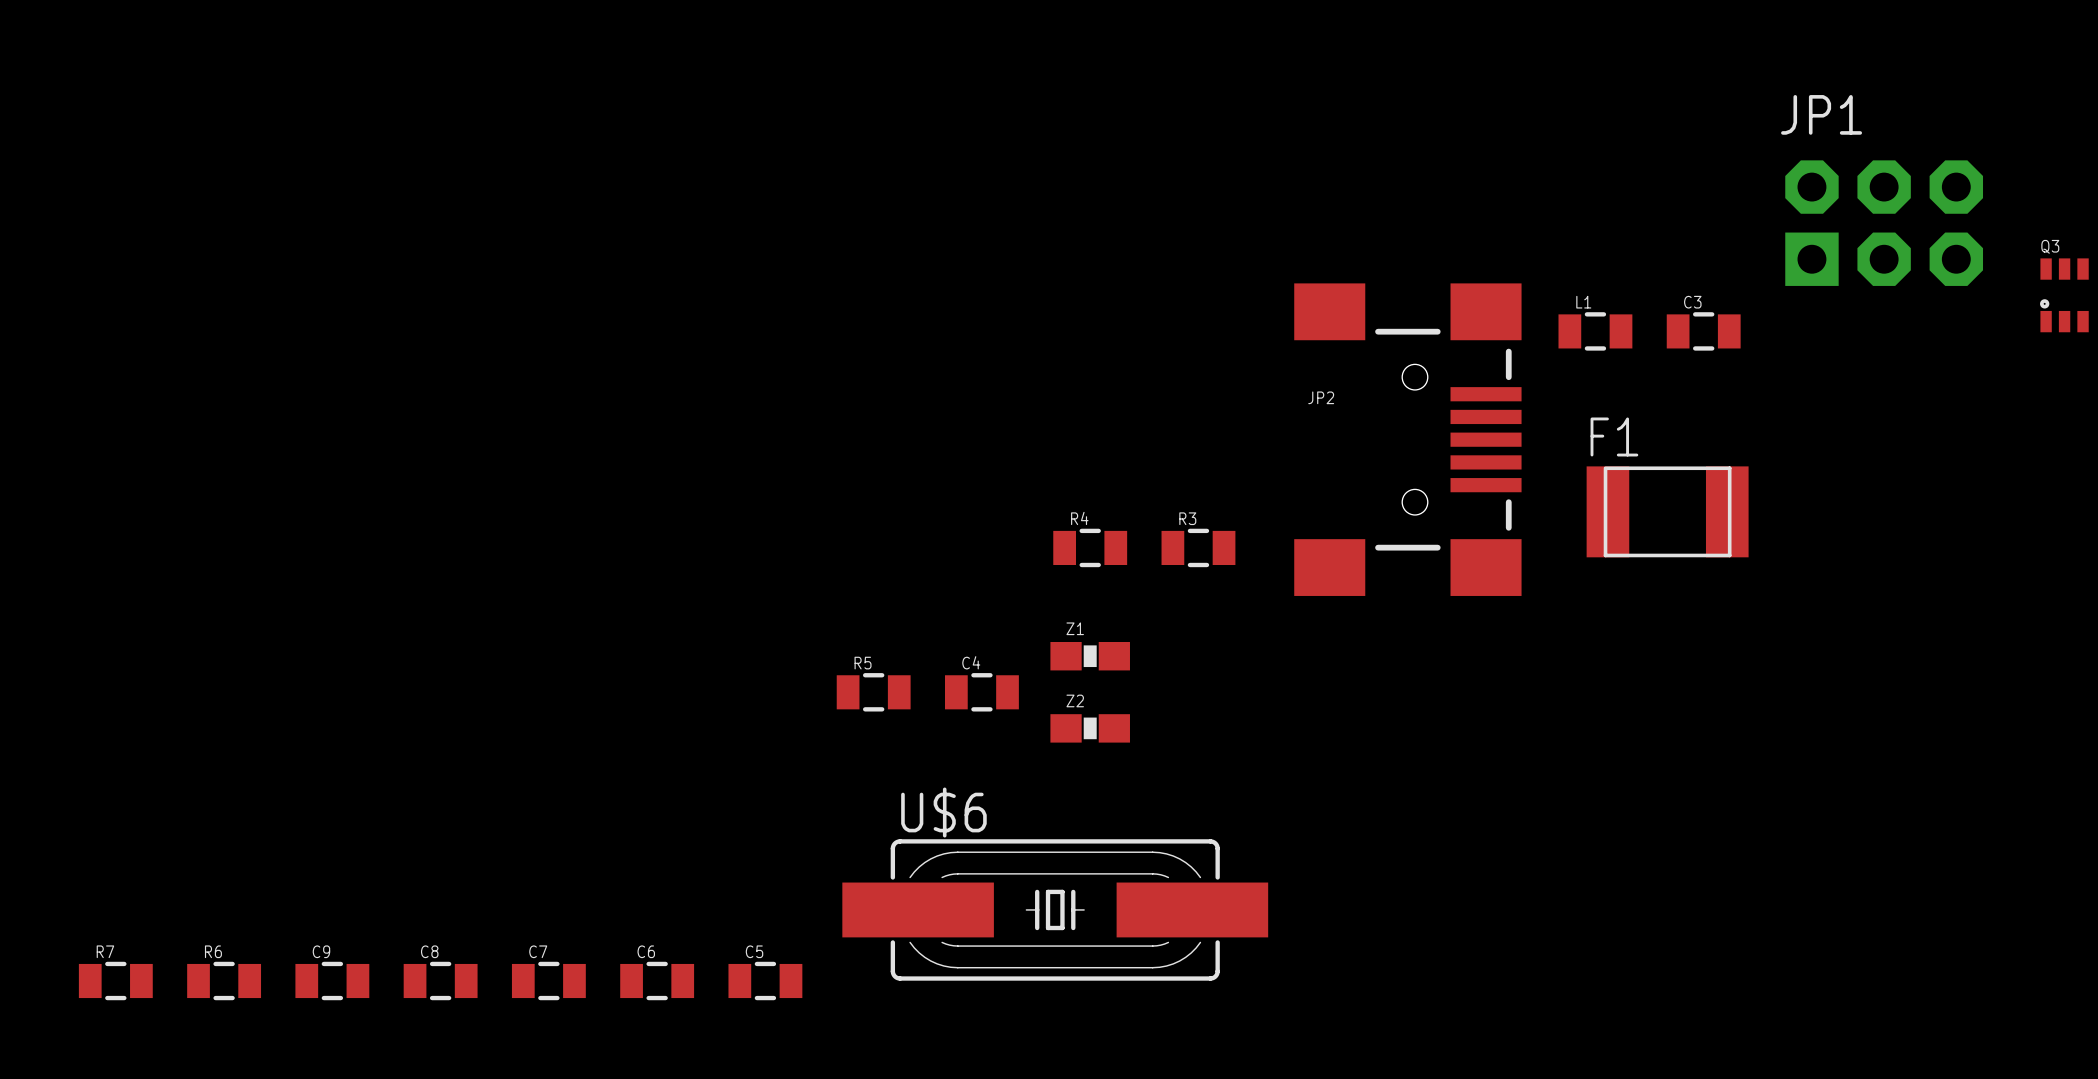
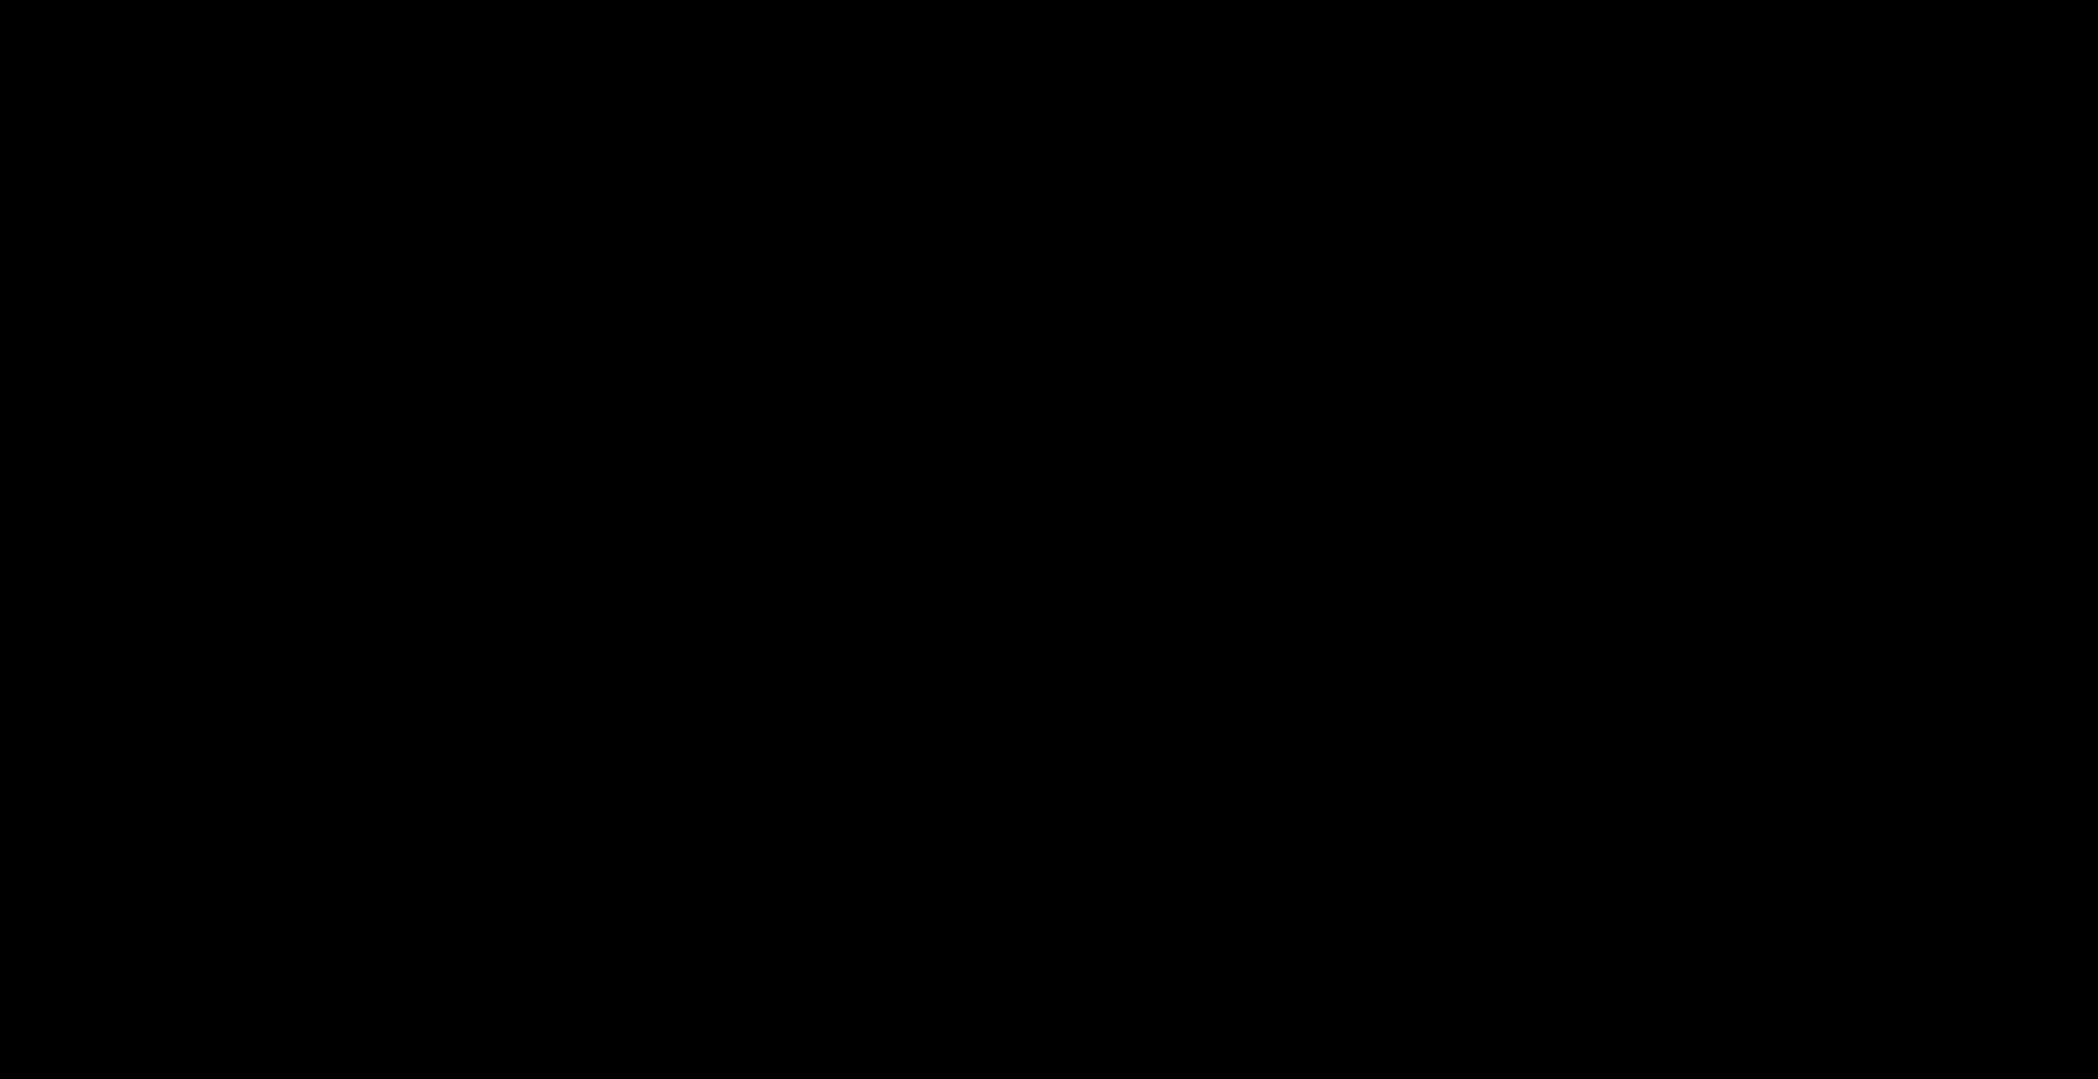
JP1: (1884, 223) -> none
Q3: (2064, 295) -> none
L1: (1595, 331) -> none
C3: (1703, 331) -> none
JP2: (1407, 439) -> none
F1: (1667, 511) -> none
R4: (1090, 547) -> none
R3: (1198, 547) -> none
Z1: (1090, 656) -> none
R5: (873, 692) -> none
C4: (981, 692) -> none
Z2: (1090, 728) -> none
U$6: (1055, 909) -> none
R7: (115, 981) -> none
R6: (224, 981) -> none
C9: (332, 981) -> none
C8: (440, 981) -> none
C7: (548, 981) -> none
C6: (657, 981) -> none
C5: (765, 981) -> none

